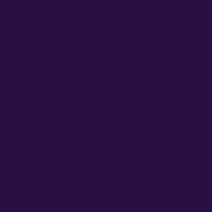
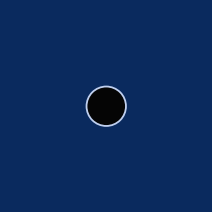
part: none -> (106, 106)

